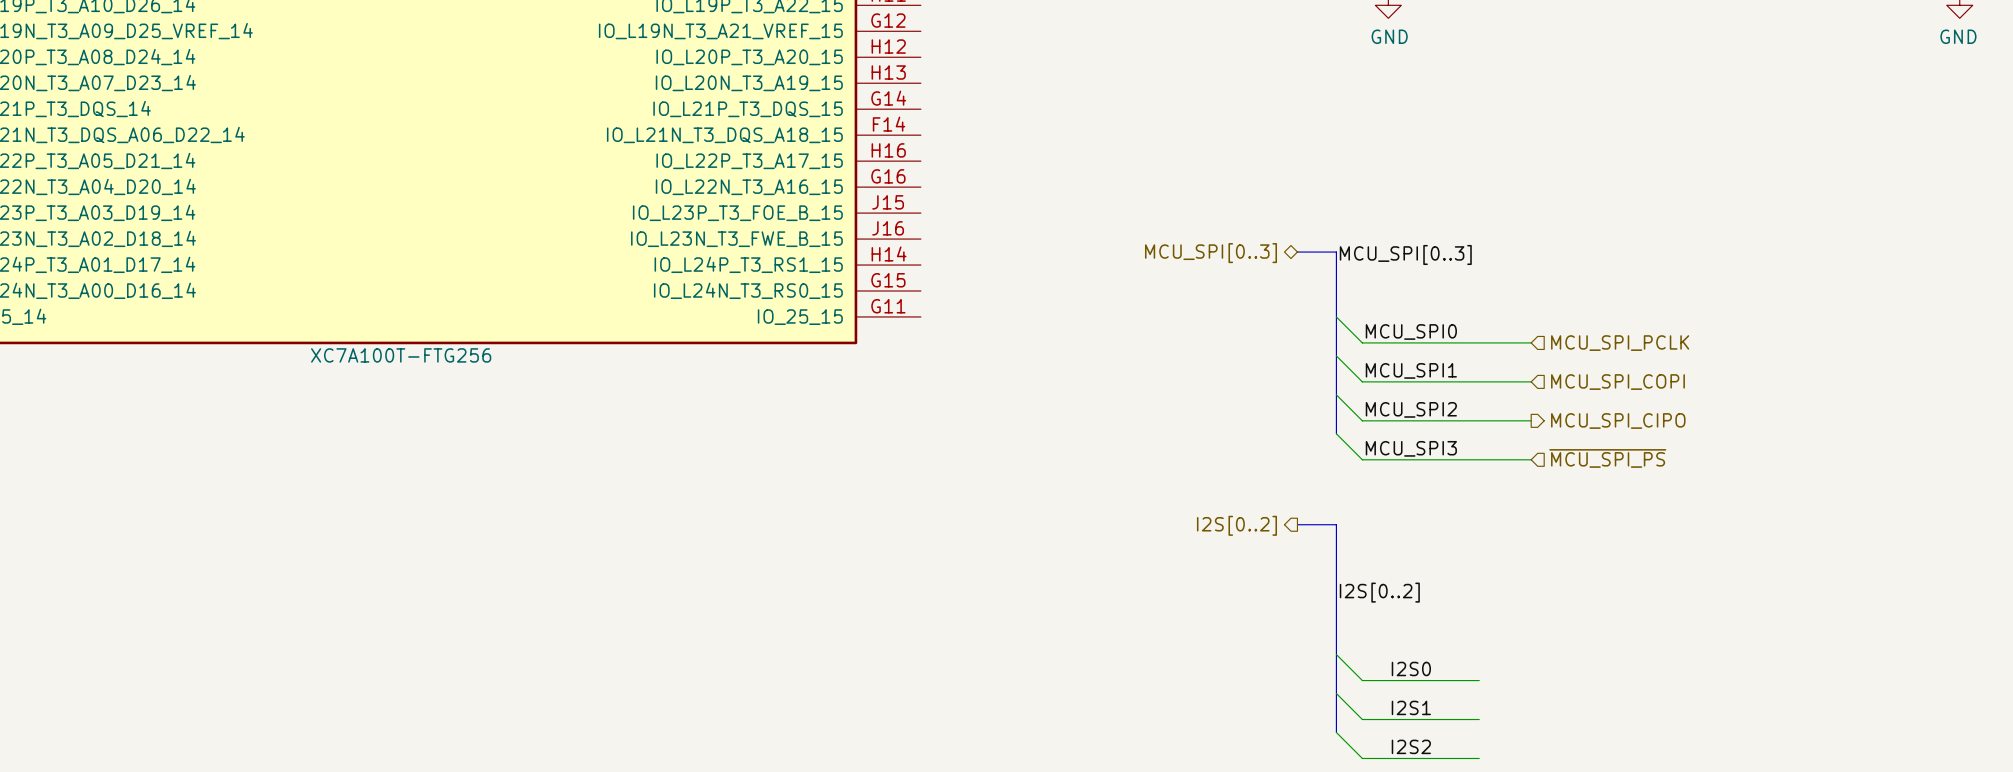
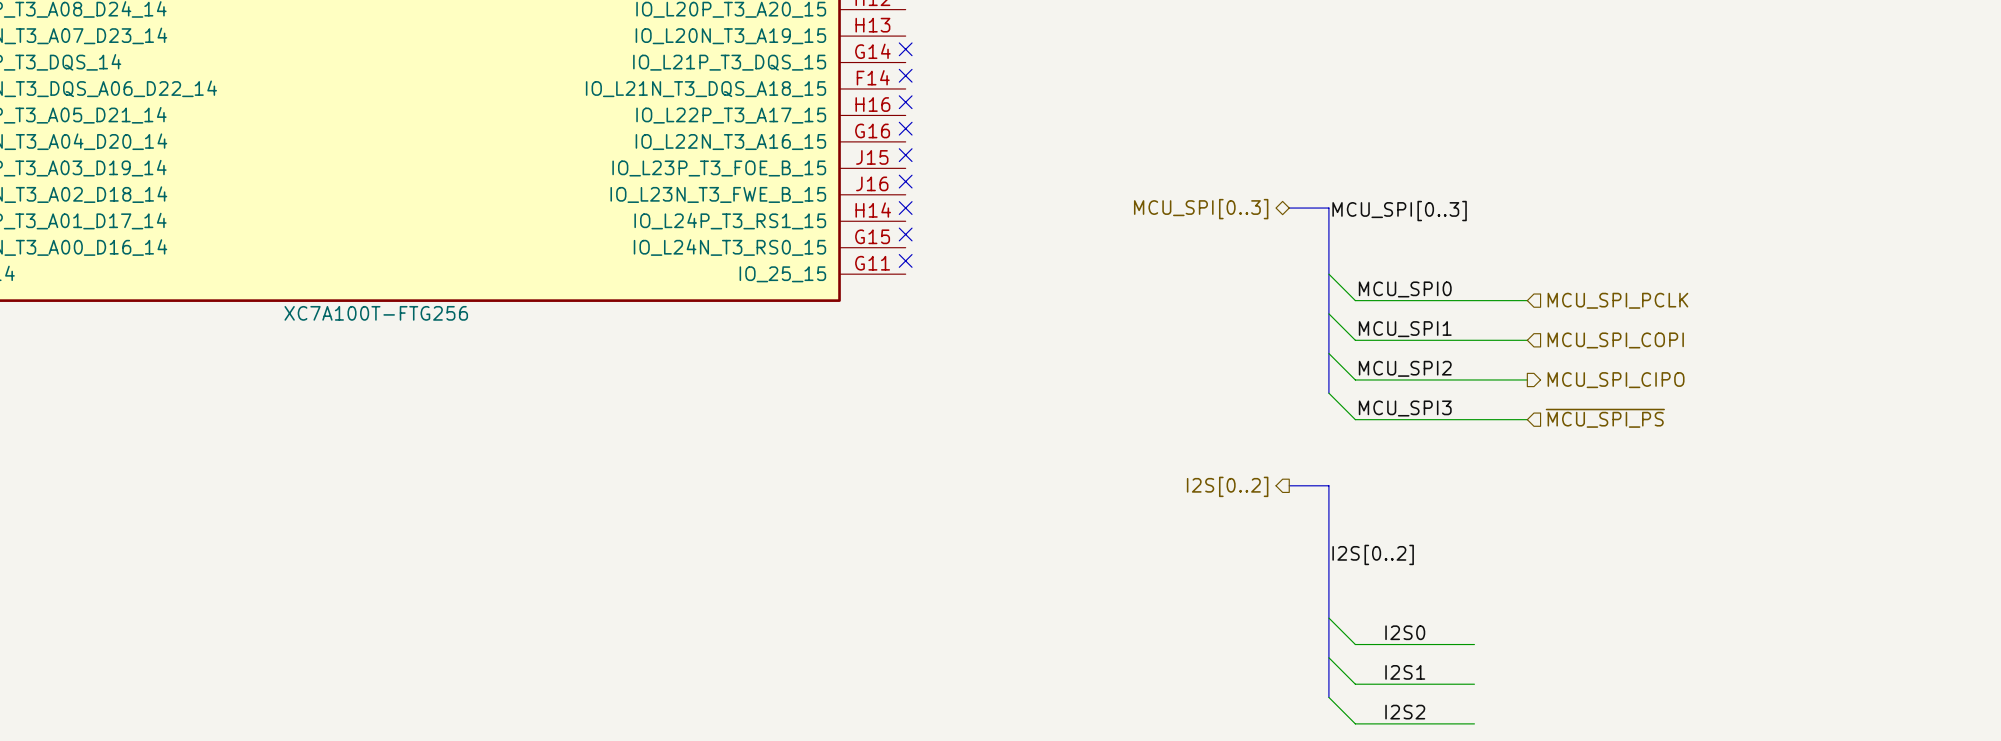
no-connect mark: none -> (905, 49)
no-connect mark: none -> (905, 75)
no-connect mark: none -> (905, 102)
no-connect mark: none -> (905, 128)
no-connect mark: none -> (905, 155)
no-connect mark: none -> (905, 181)
no-connect mark: none -> (905, 208)
no-connect mark: none -> (905, 234)
no-connect mark: none -> (905, 260)

